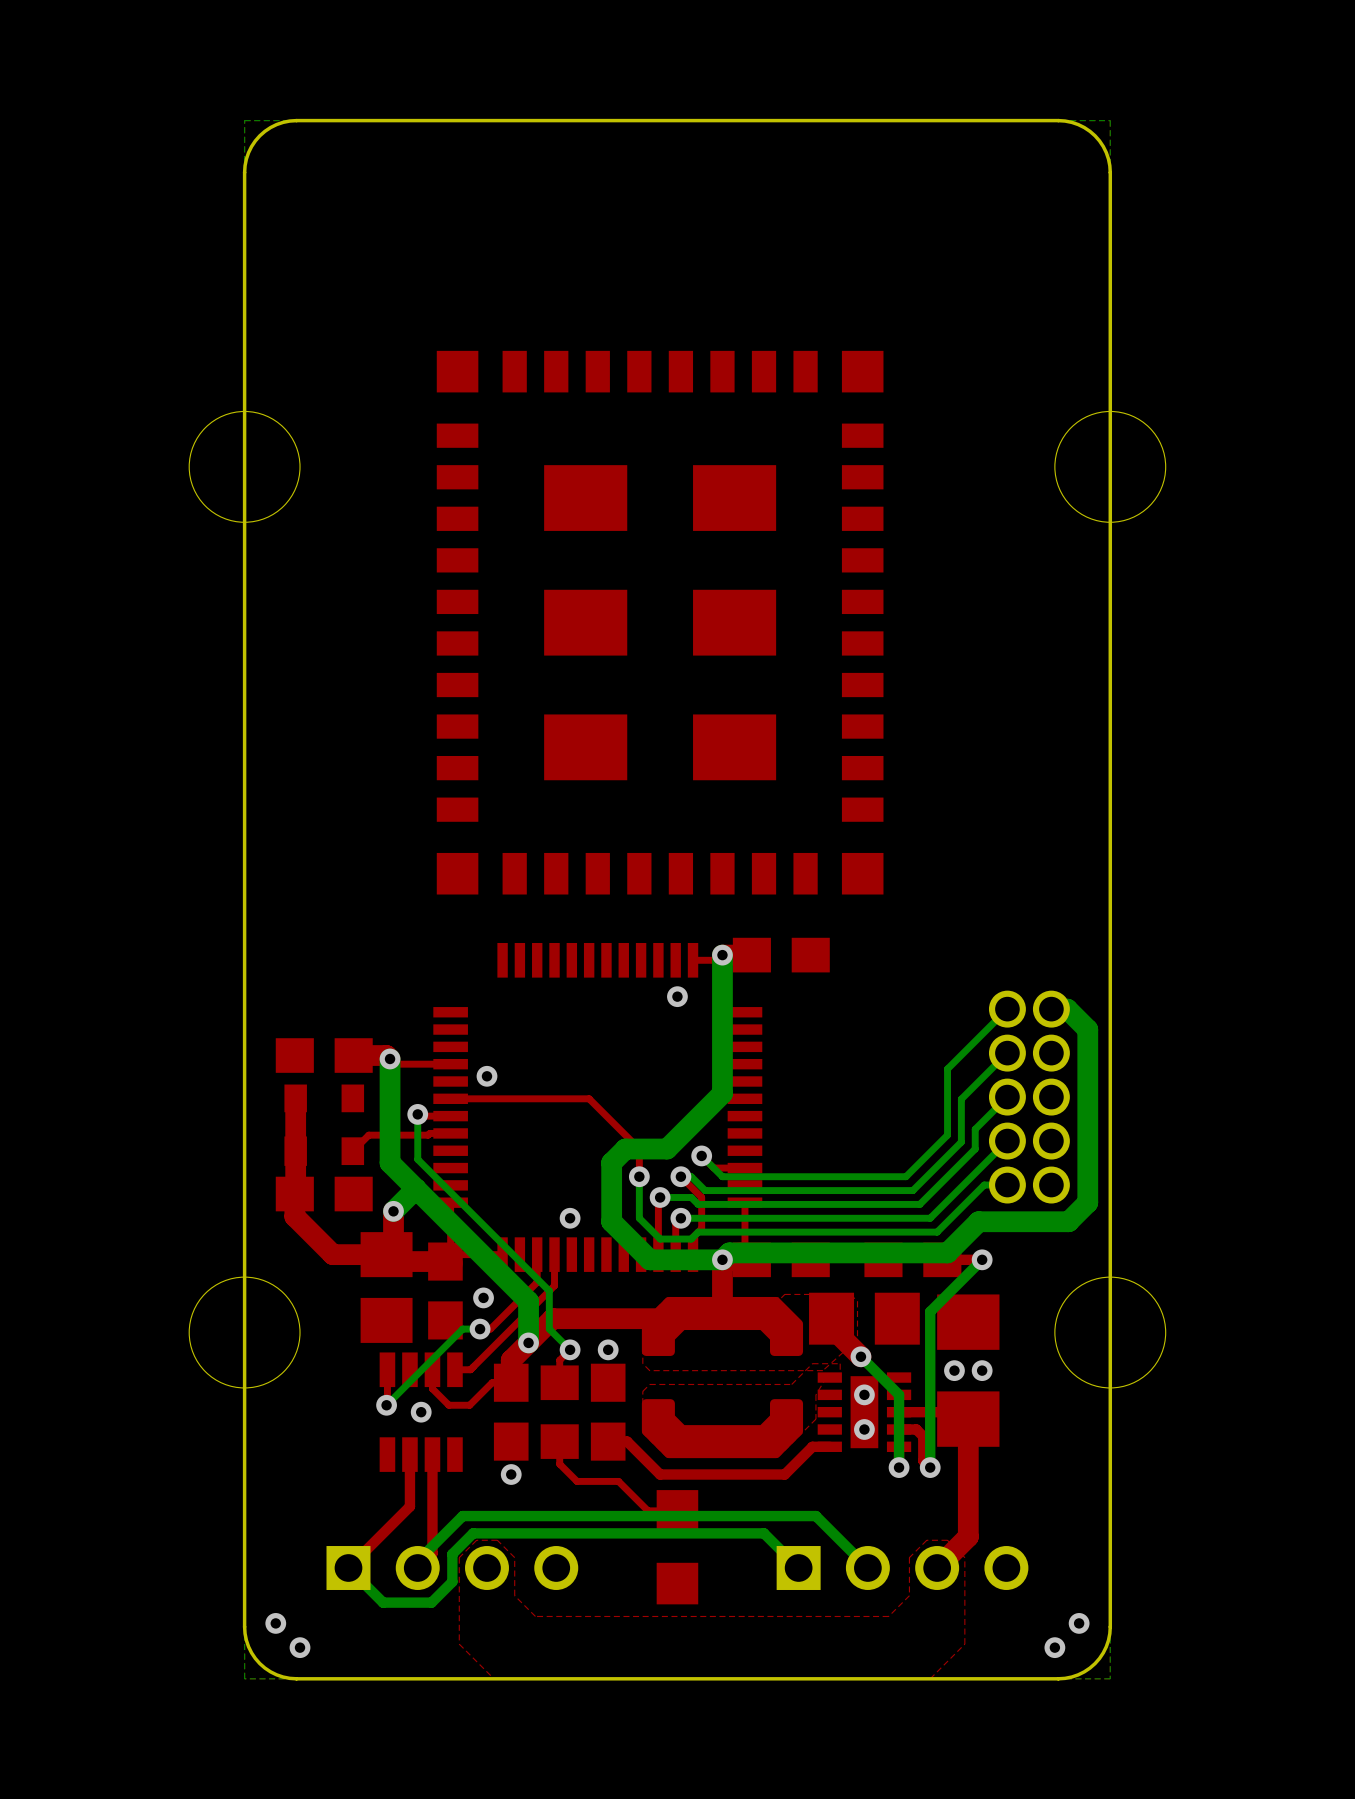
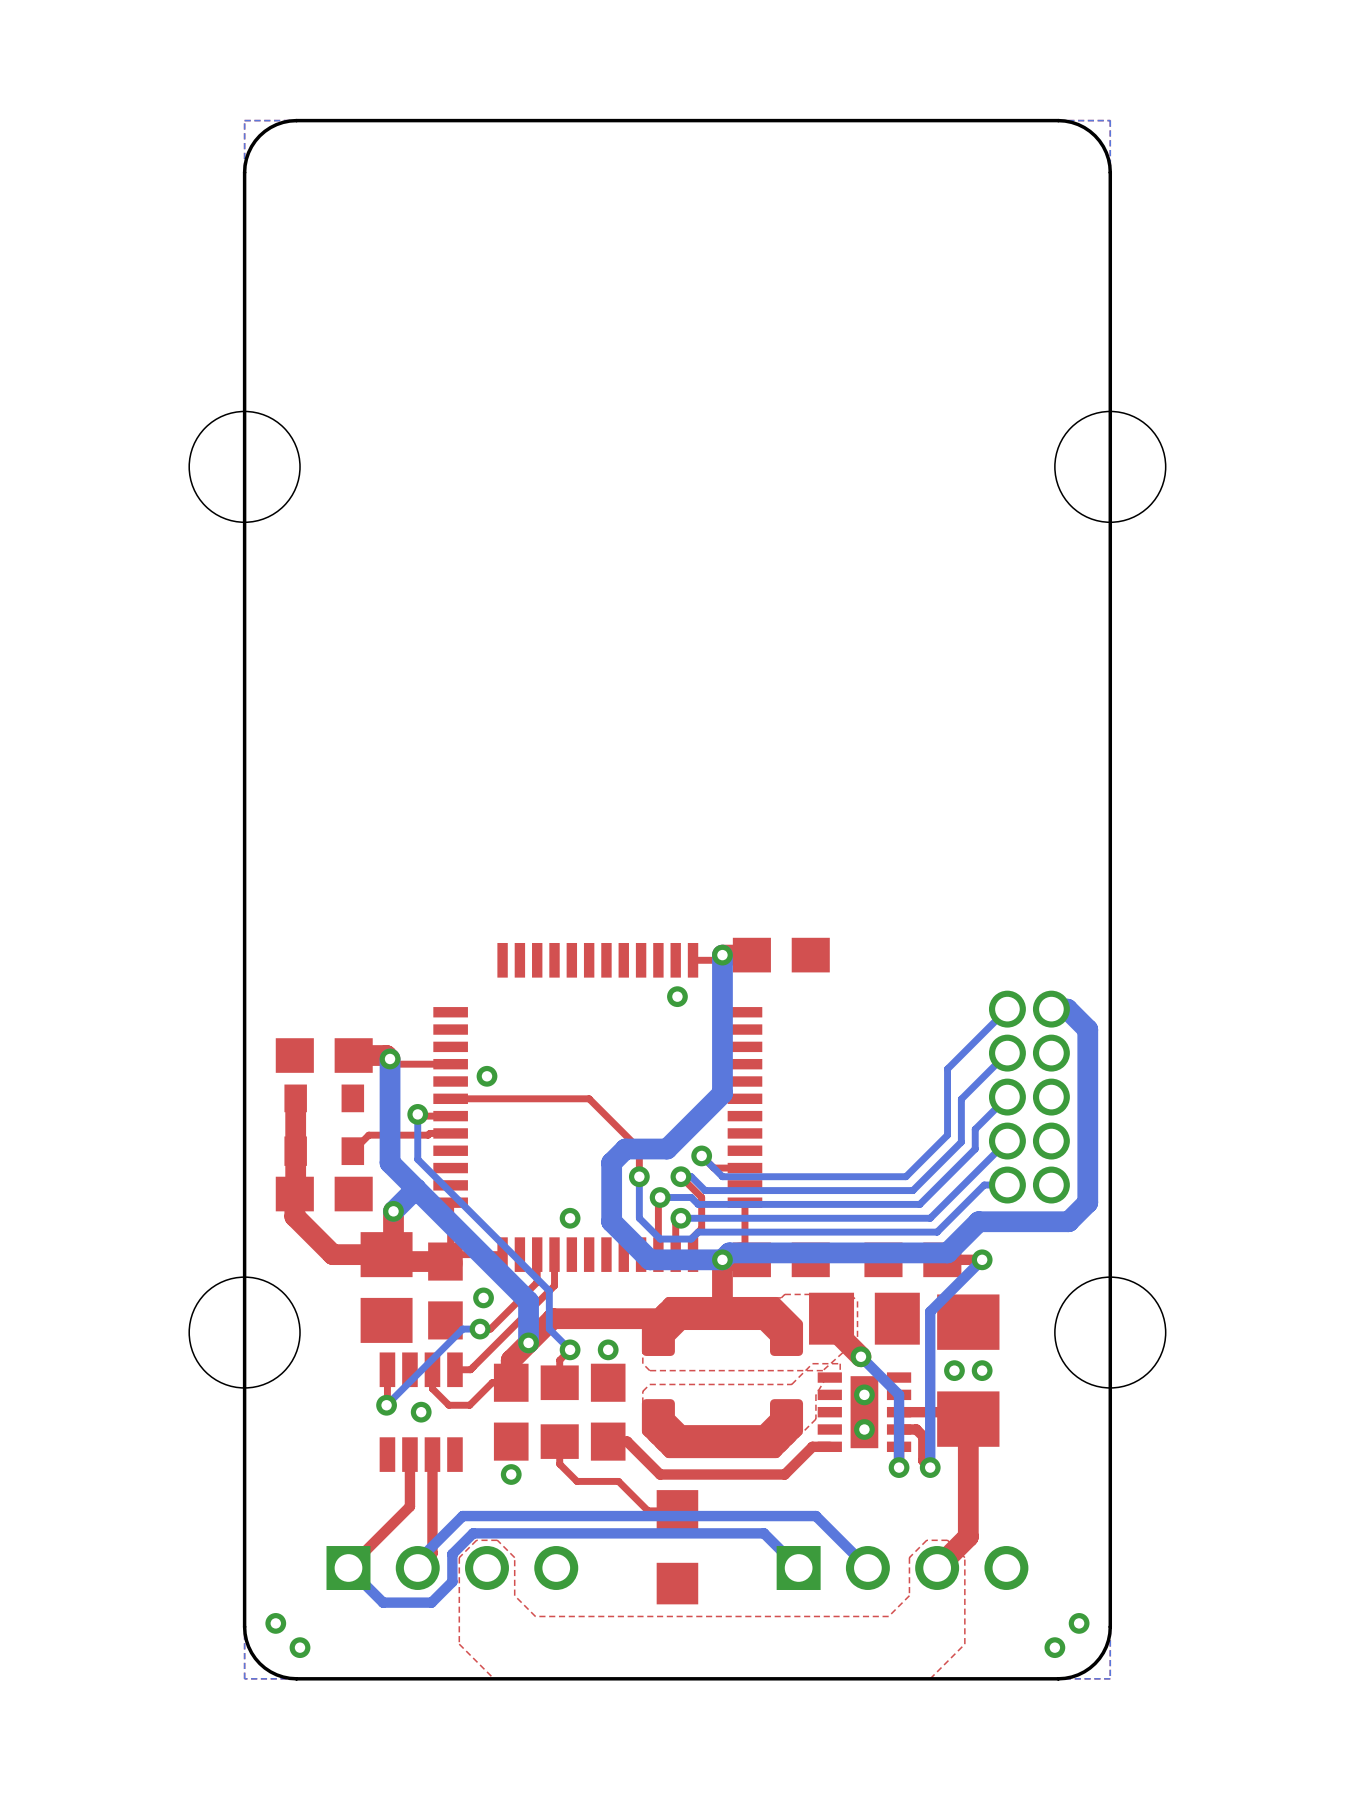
part: (660, 622) -> none

